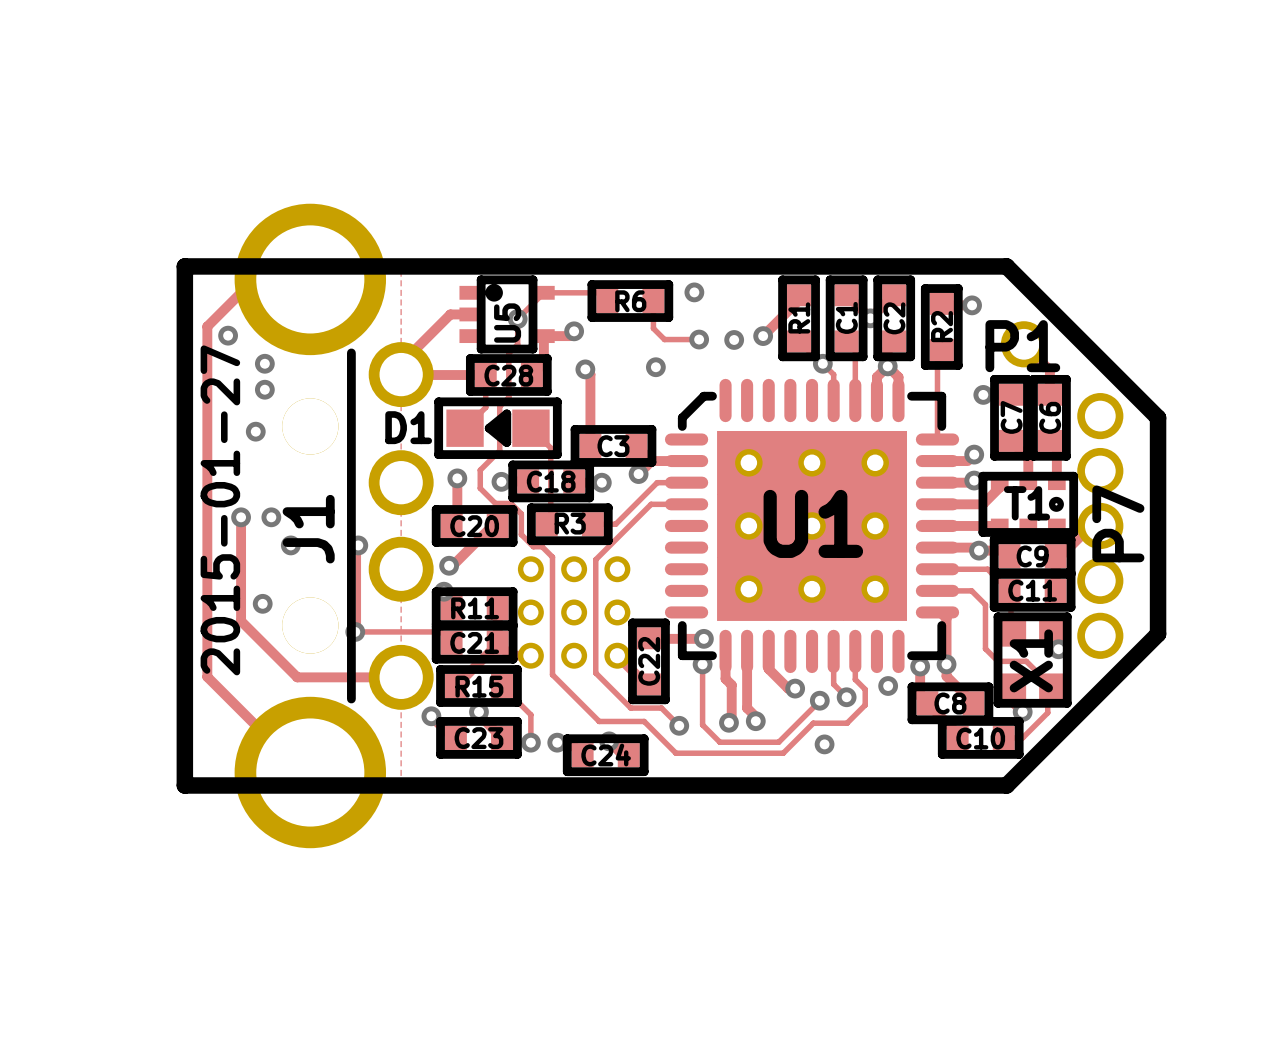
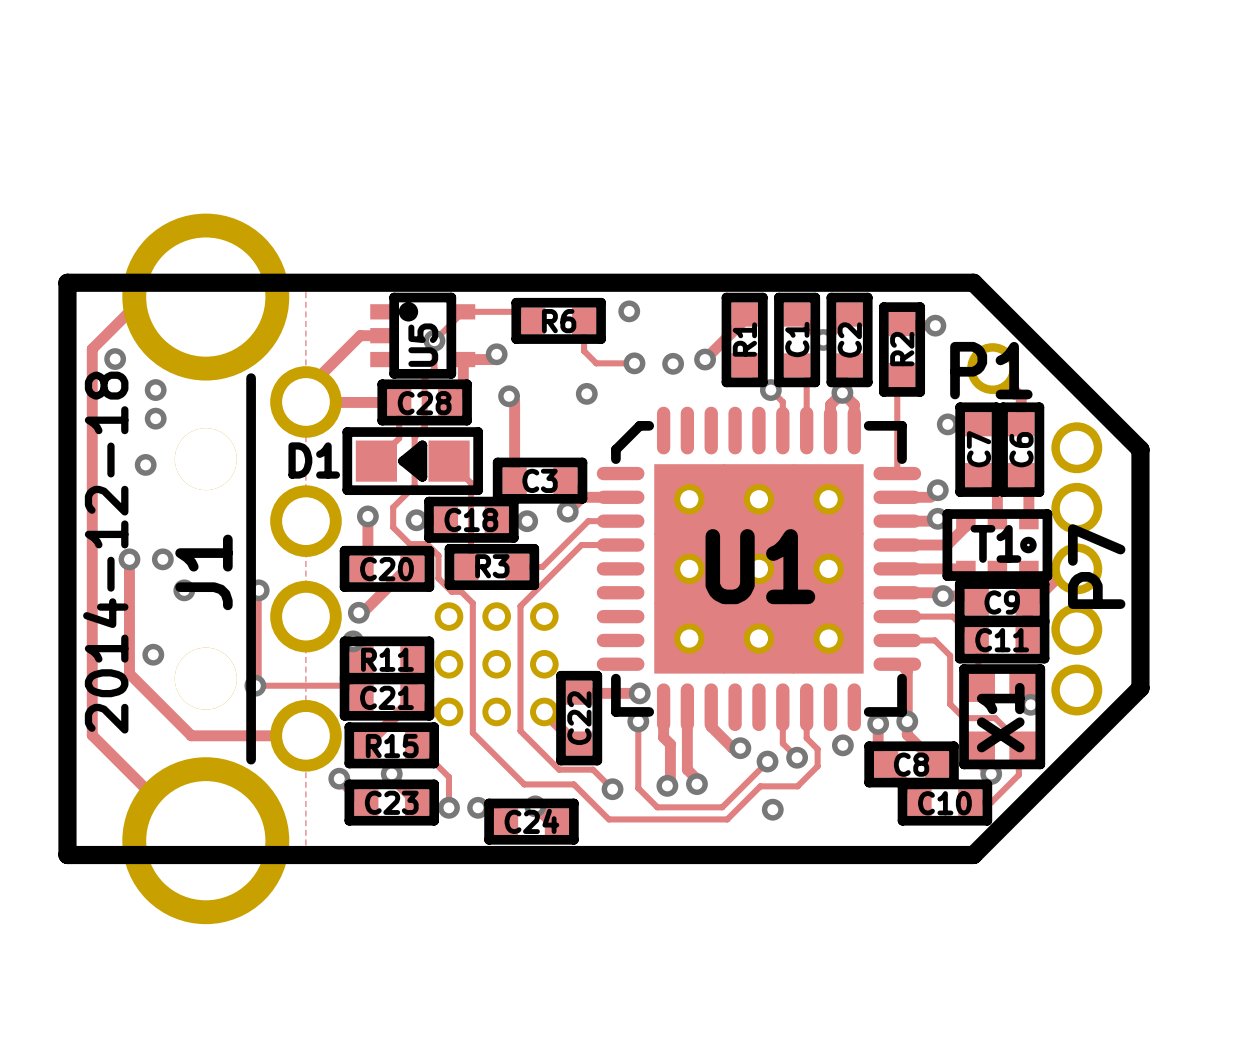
text: 2015-01-27 (220, 510) -> 2014-12-18 (105, 552)

